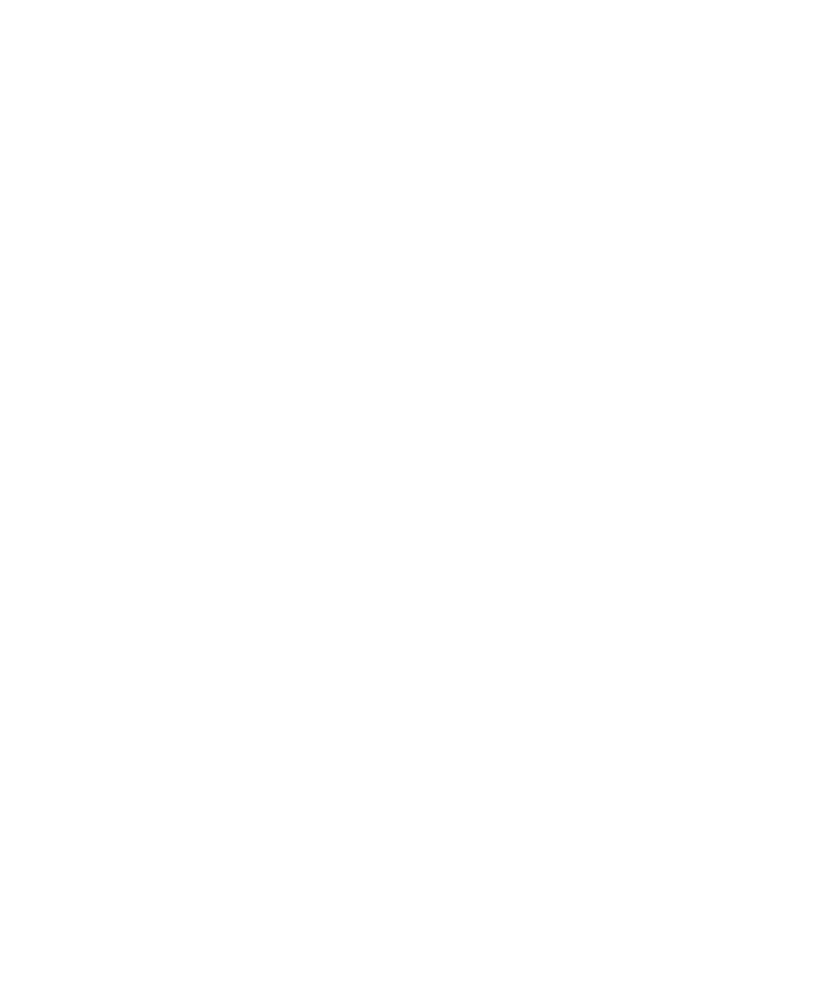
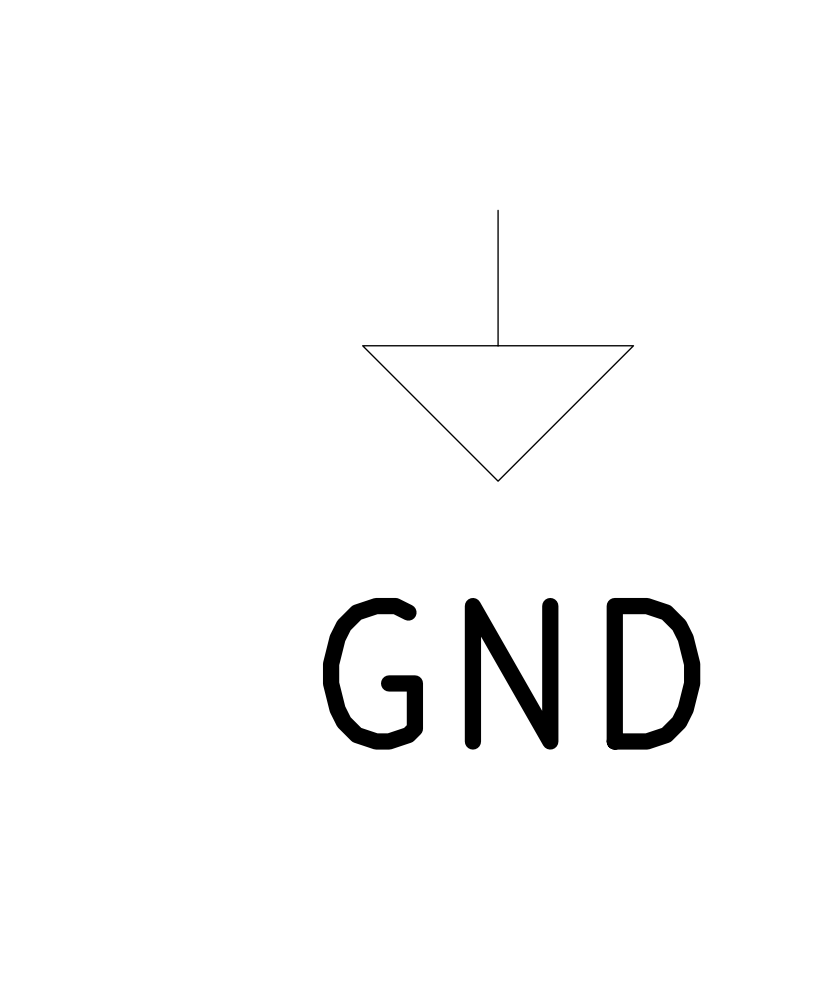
power symbol: none -> GND (498, 345)

